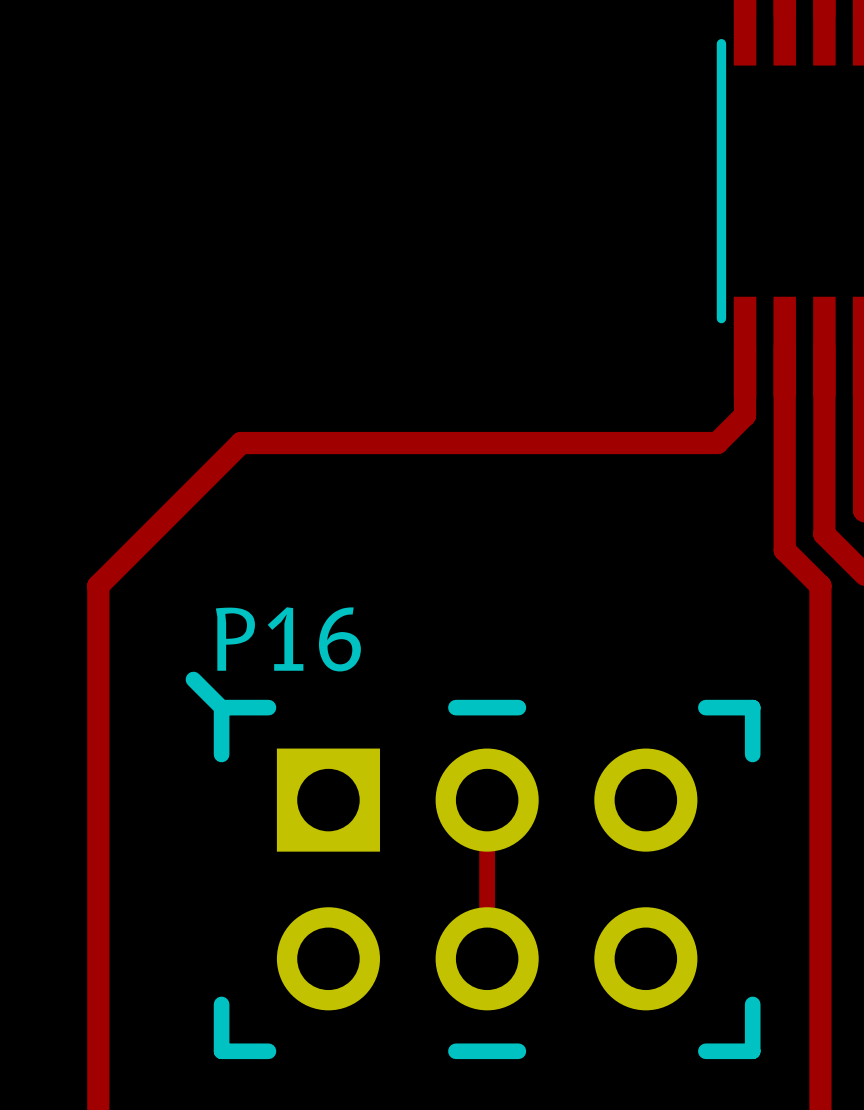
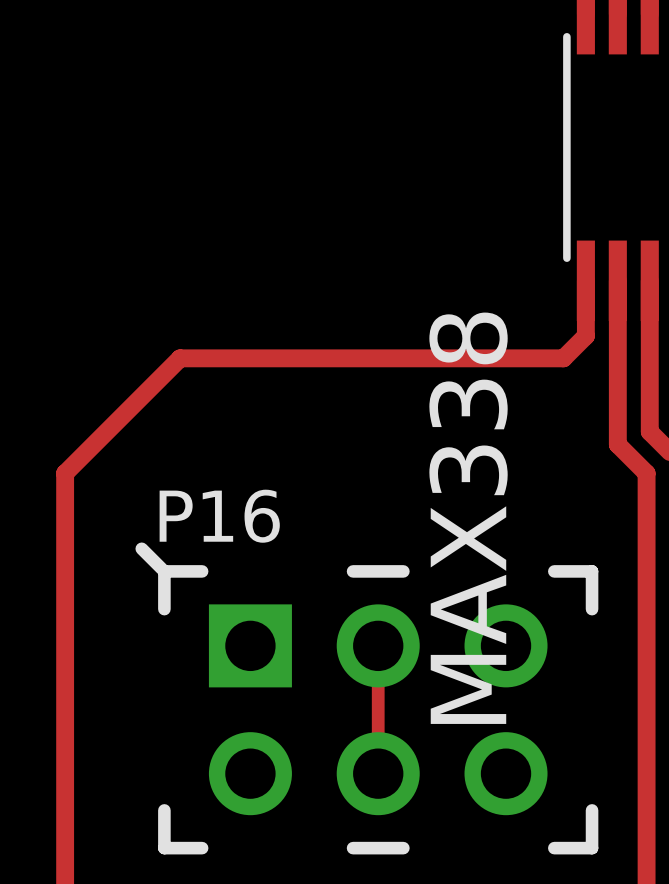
part value: none -> MAX338 (468, 518)

